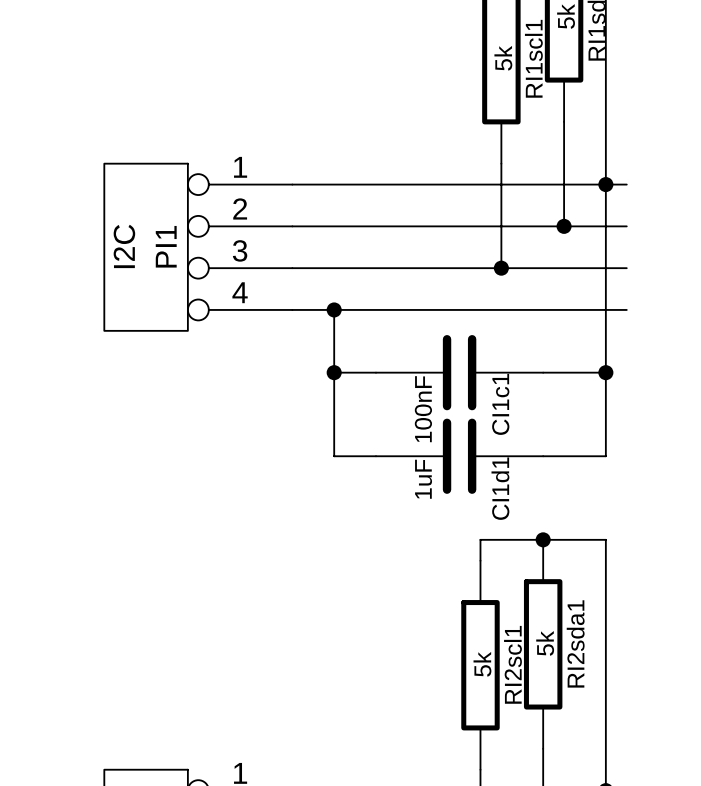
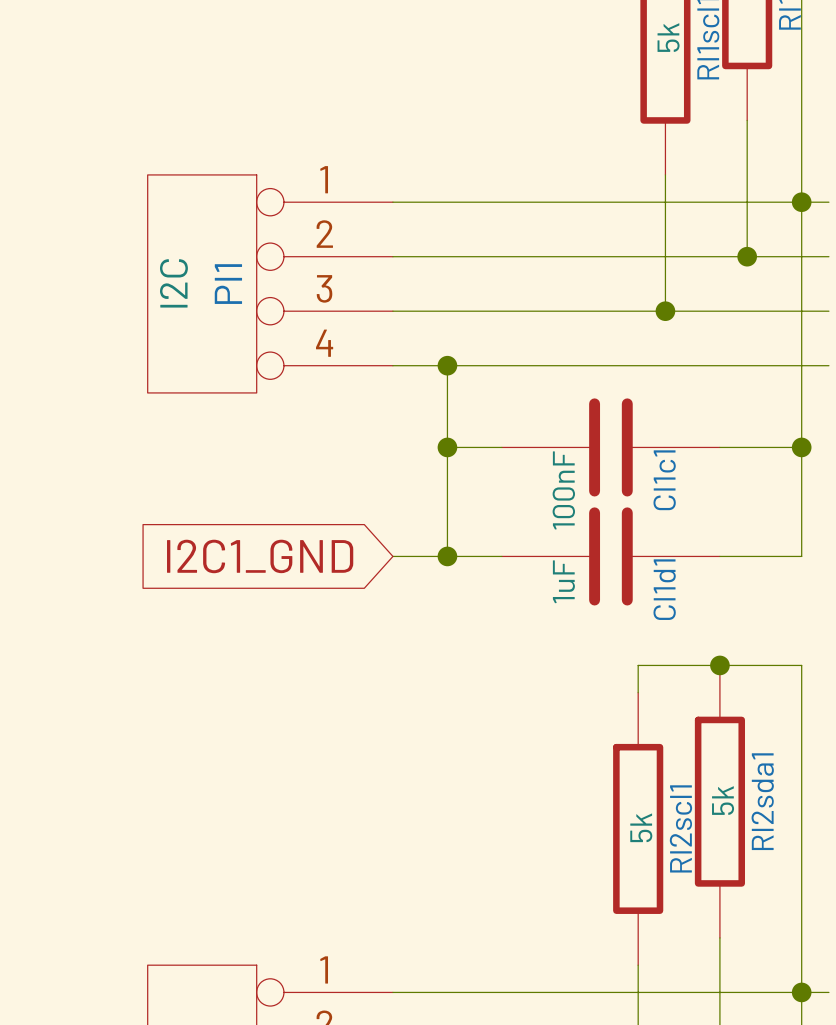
wire: none -> (392, 556) (447, 556)
junction: none -> (447, 556)
global label: none -> I2C1_GND (260, 556)

